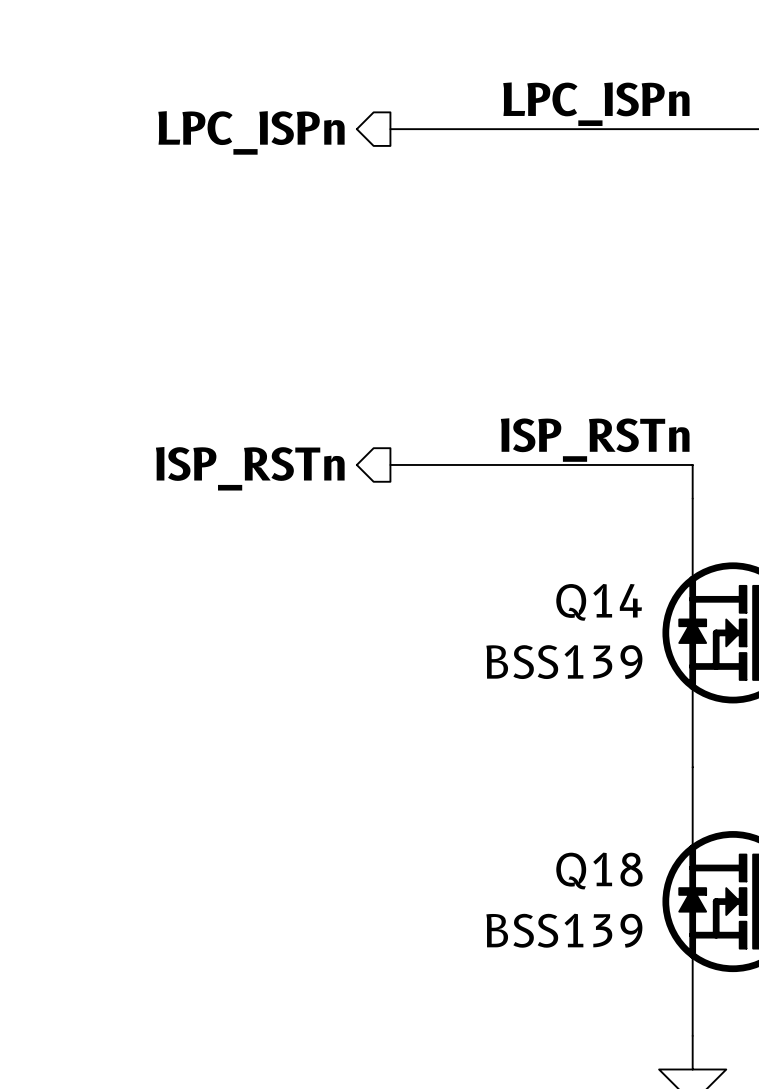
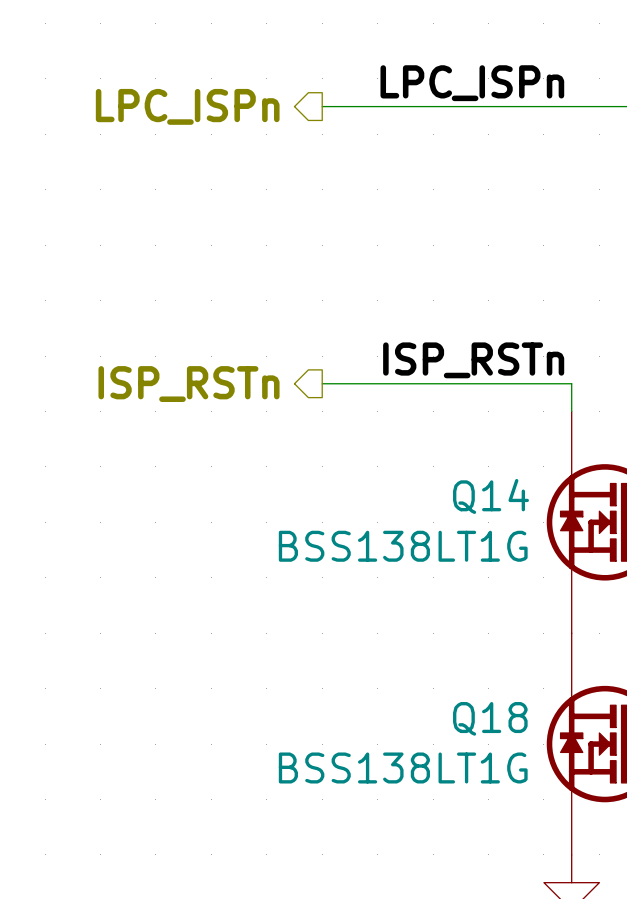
Q14 value: BSS139 (564, 662) -> BSS138LT1G (403, 546)
Q18 value: BSS139 (564, 930) -> BSS138LT1G (403, 767)

